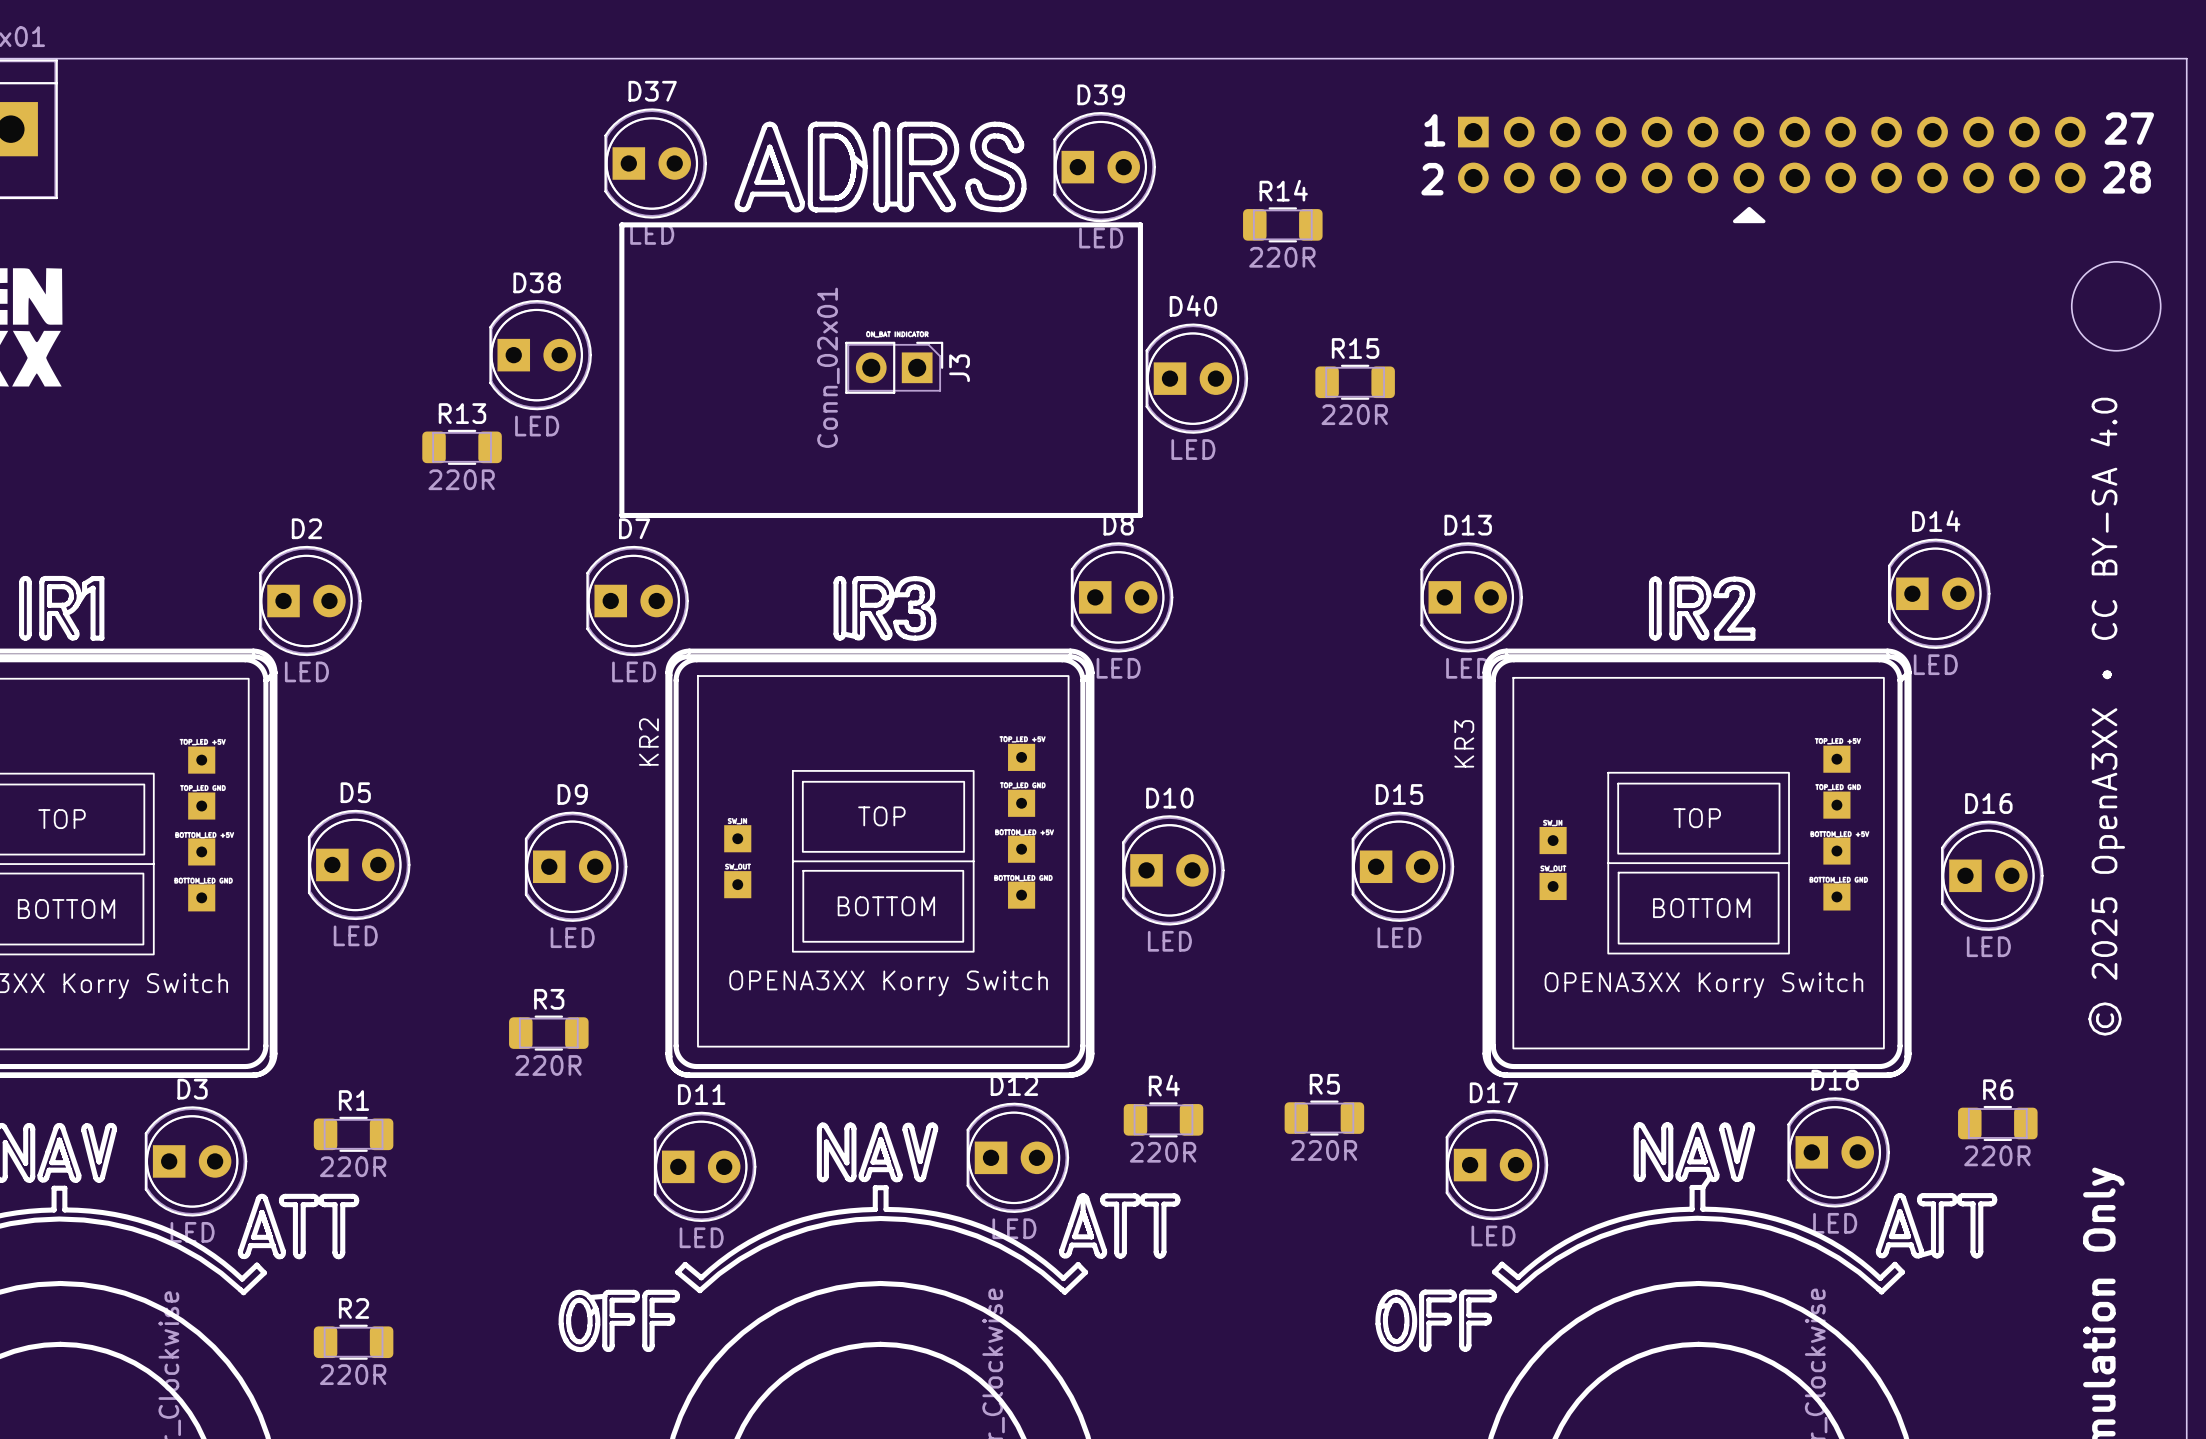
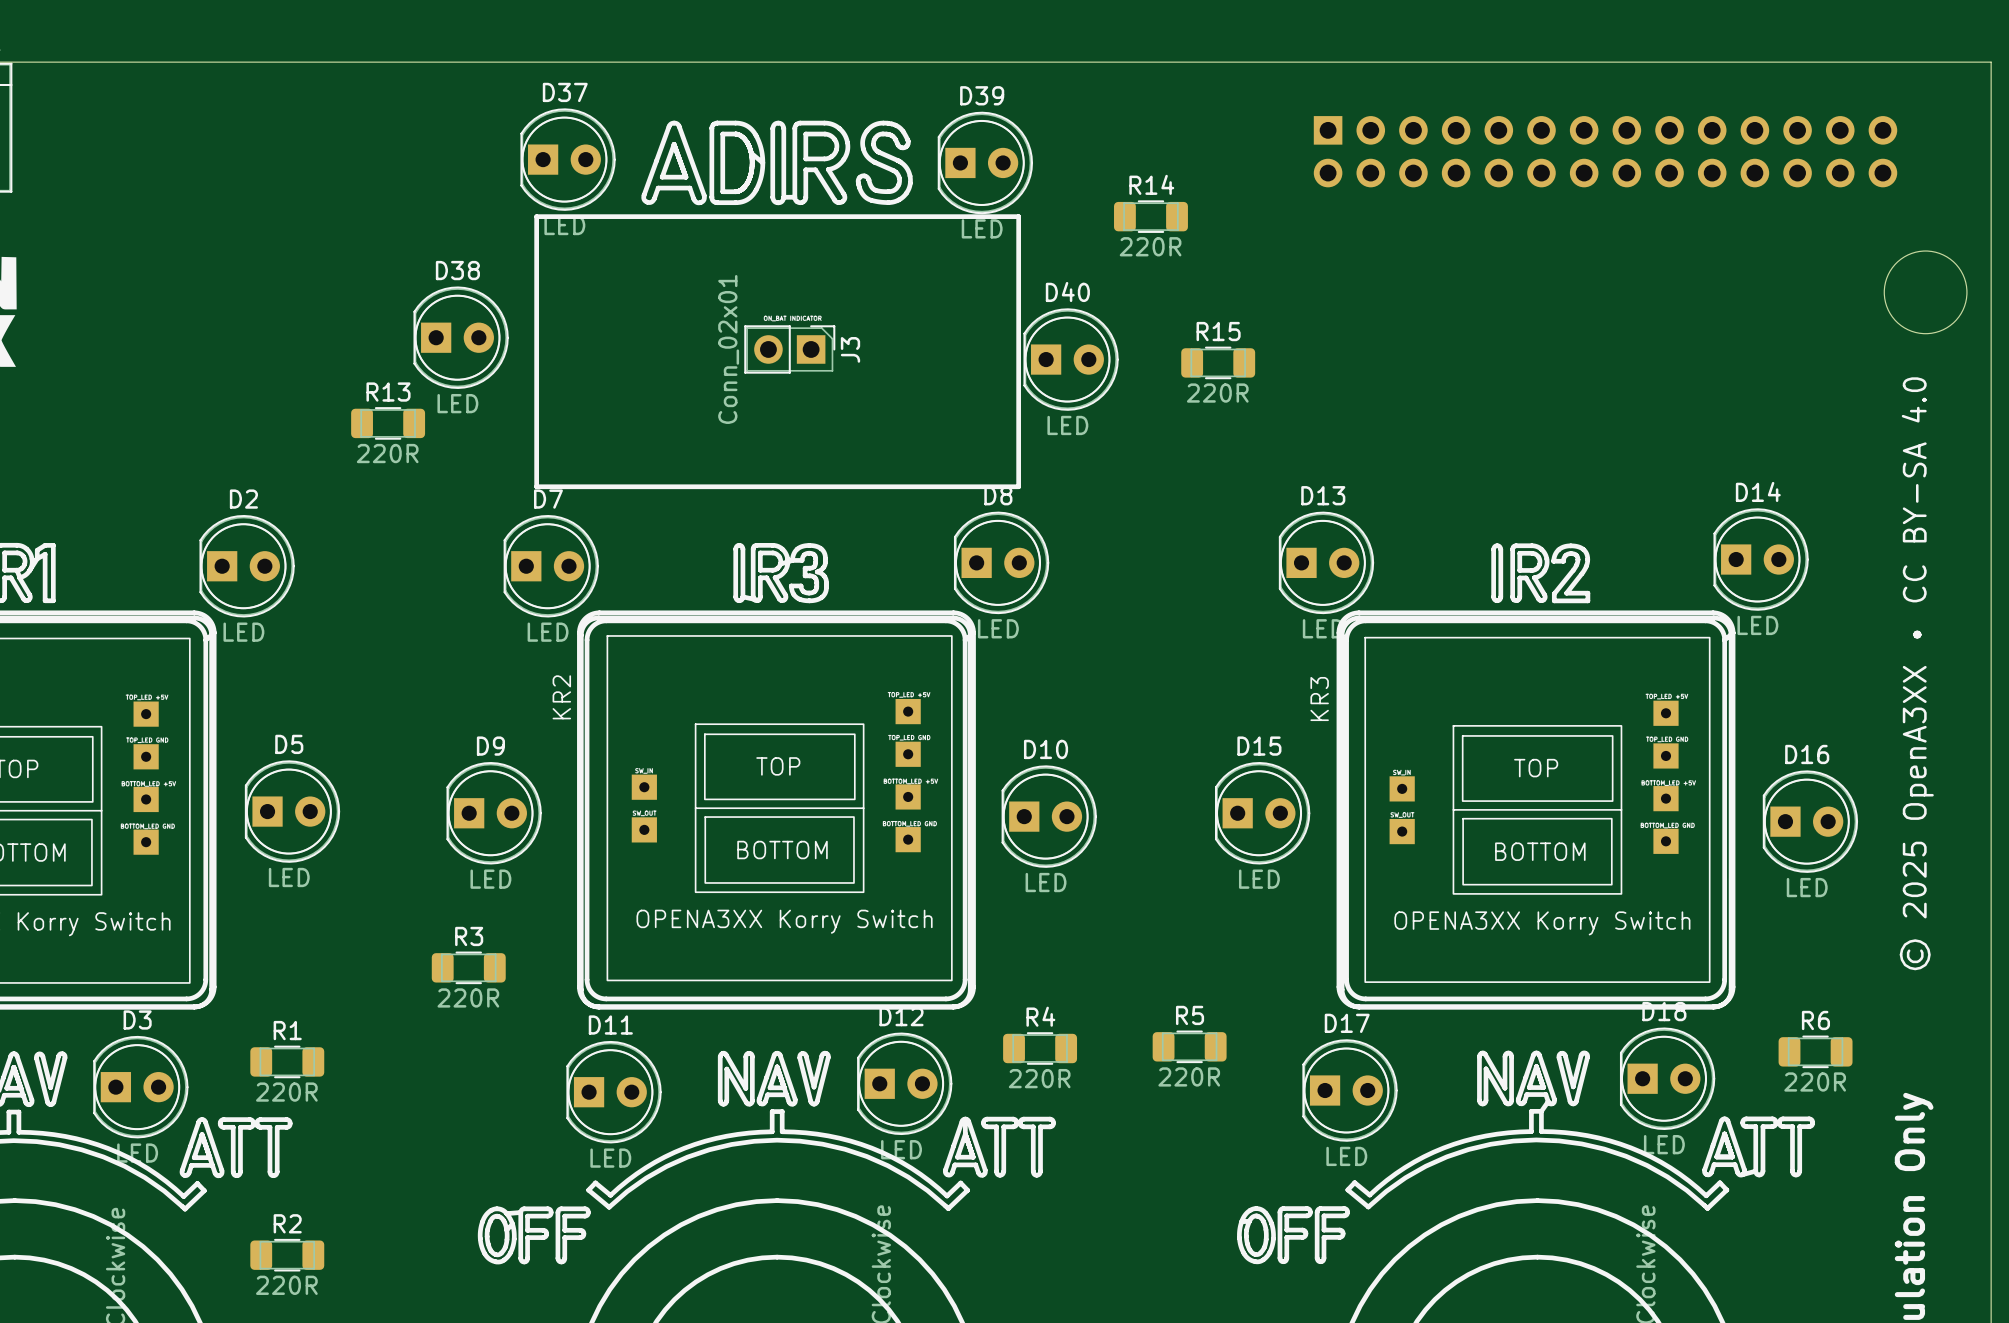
text: 27 (2129, 128) -> none
text: 1 (1434, 130) -> none
text: 28 (2126, 177) -> none
text: 2 (1432, 179) -> none
drawing: [1732, 206, 1766, 224] -> none

